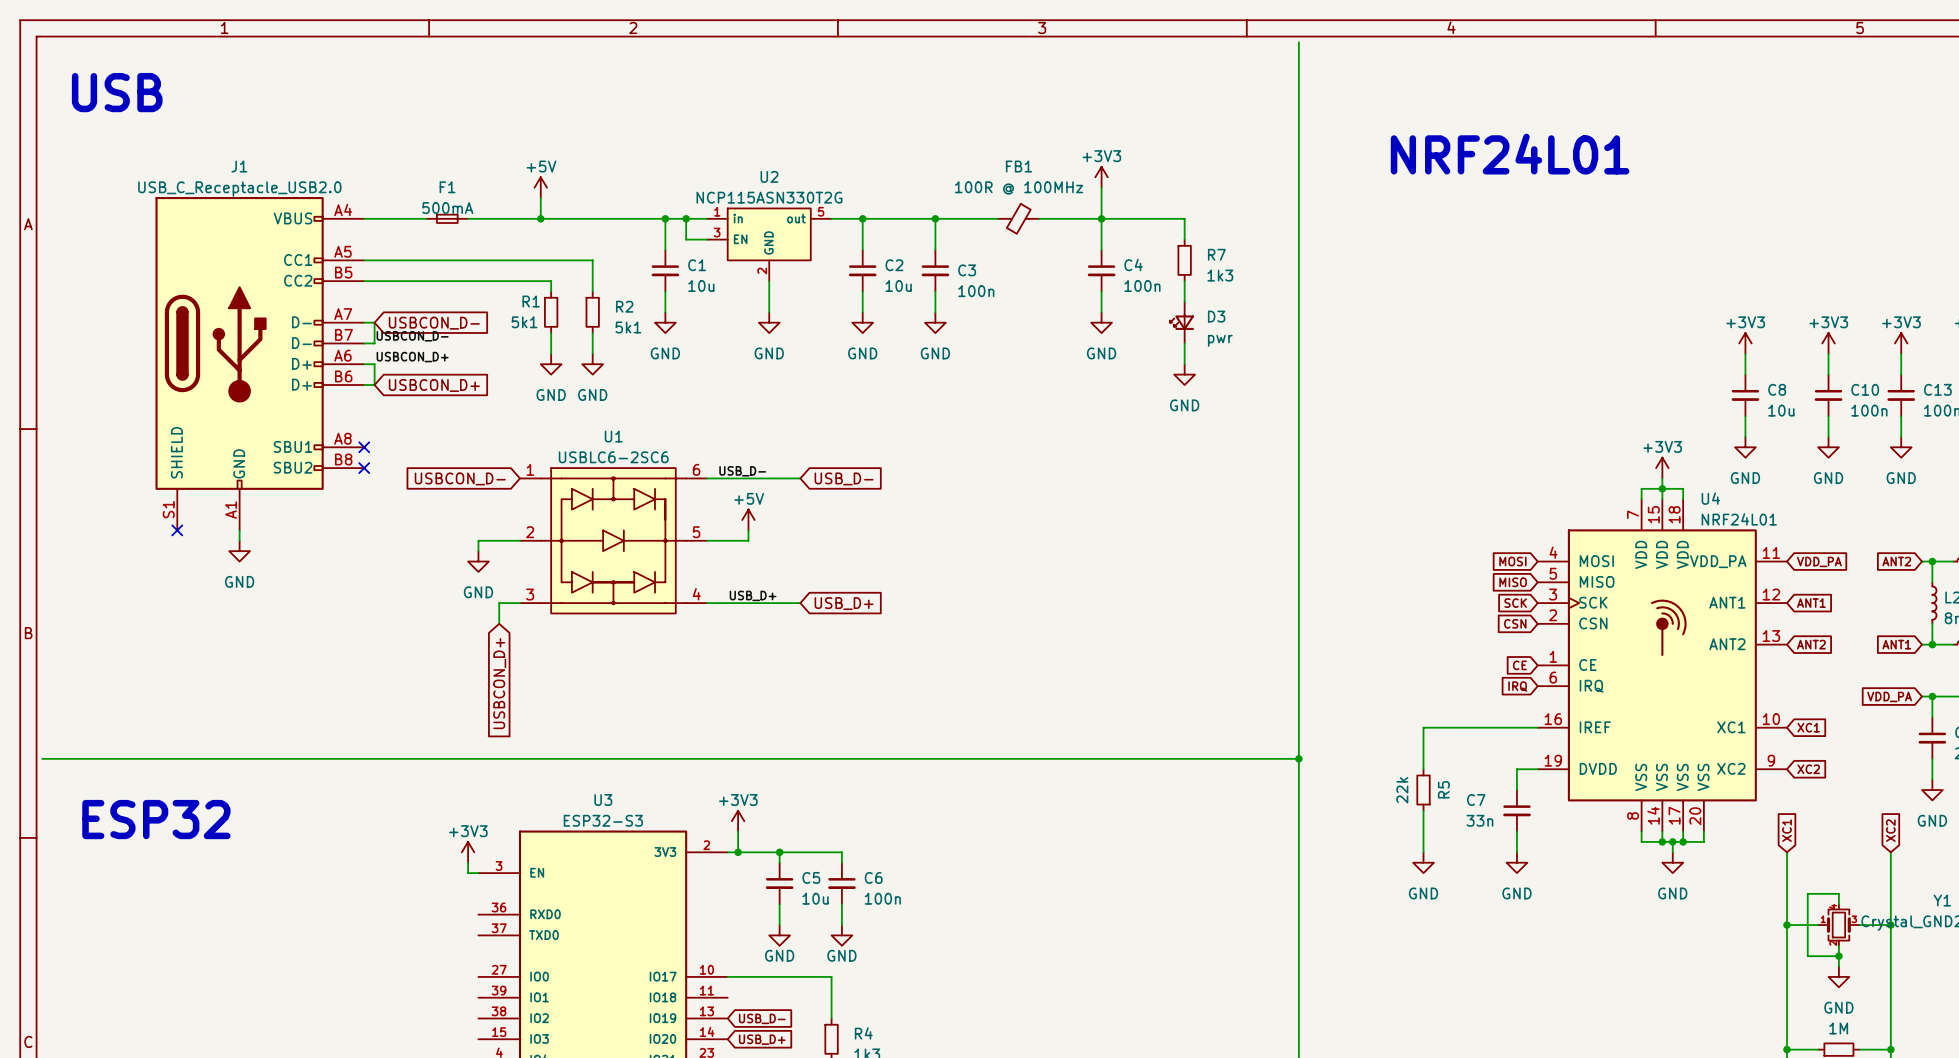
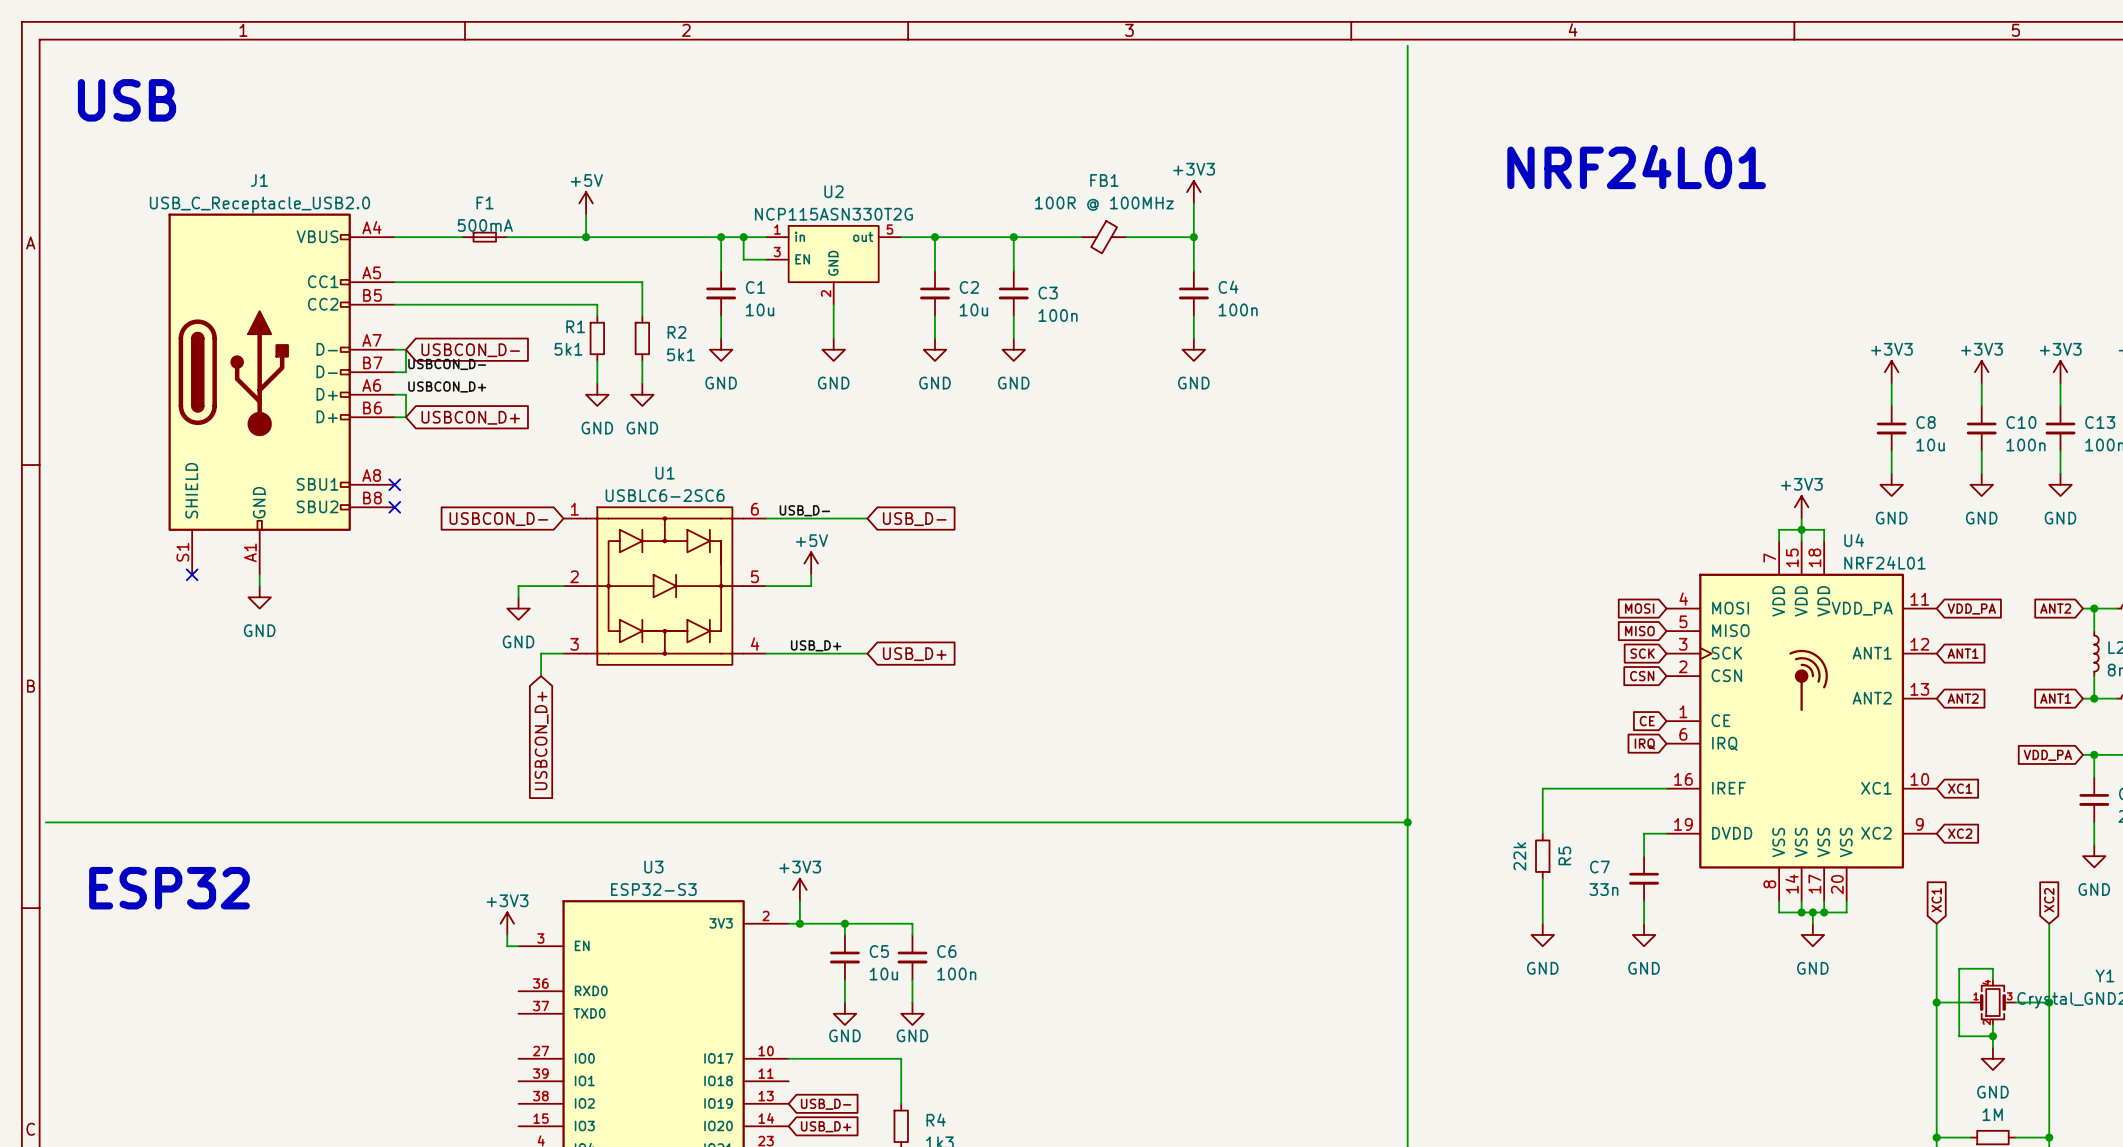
wire: (1101, 218) (1184, 218) (1184, 239) -> none
R7: 1k3 (1184, 260) -> none
wire: (1184, 281) (1184, 301) -> none
D3: pwr (1182, 322) -> none
wire: (1184, 343) (1184, 364) -> none
power symbol: GND (1184, 374) -> none

